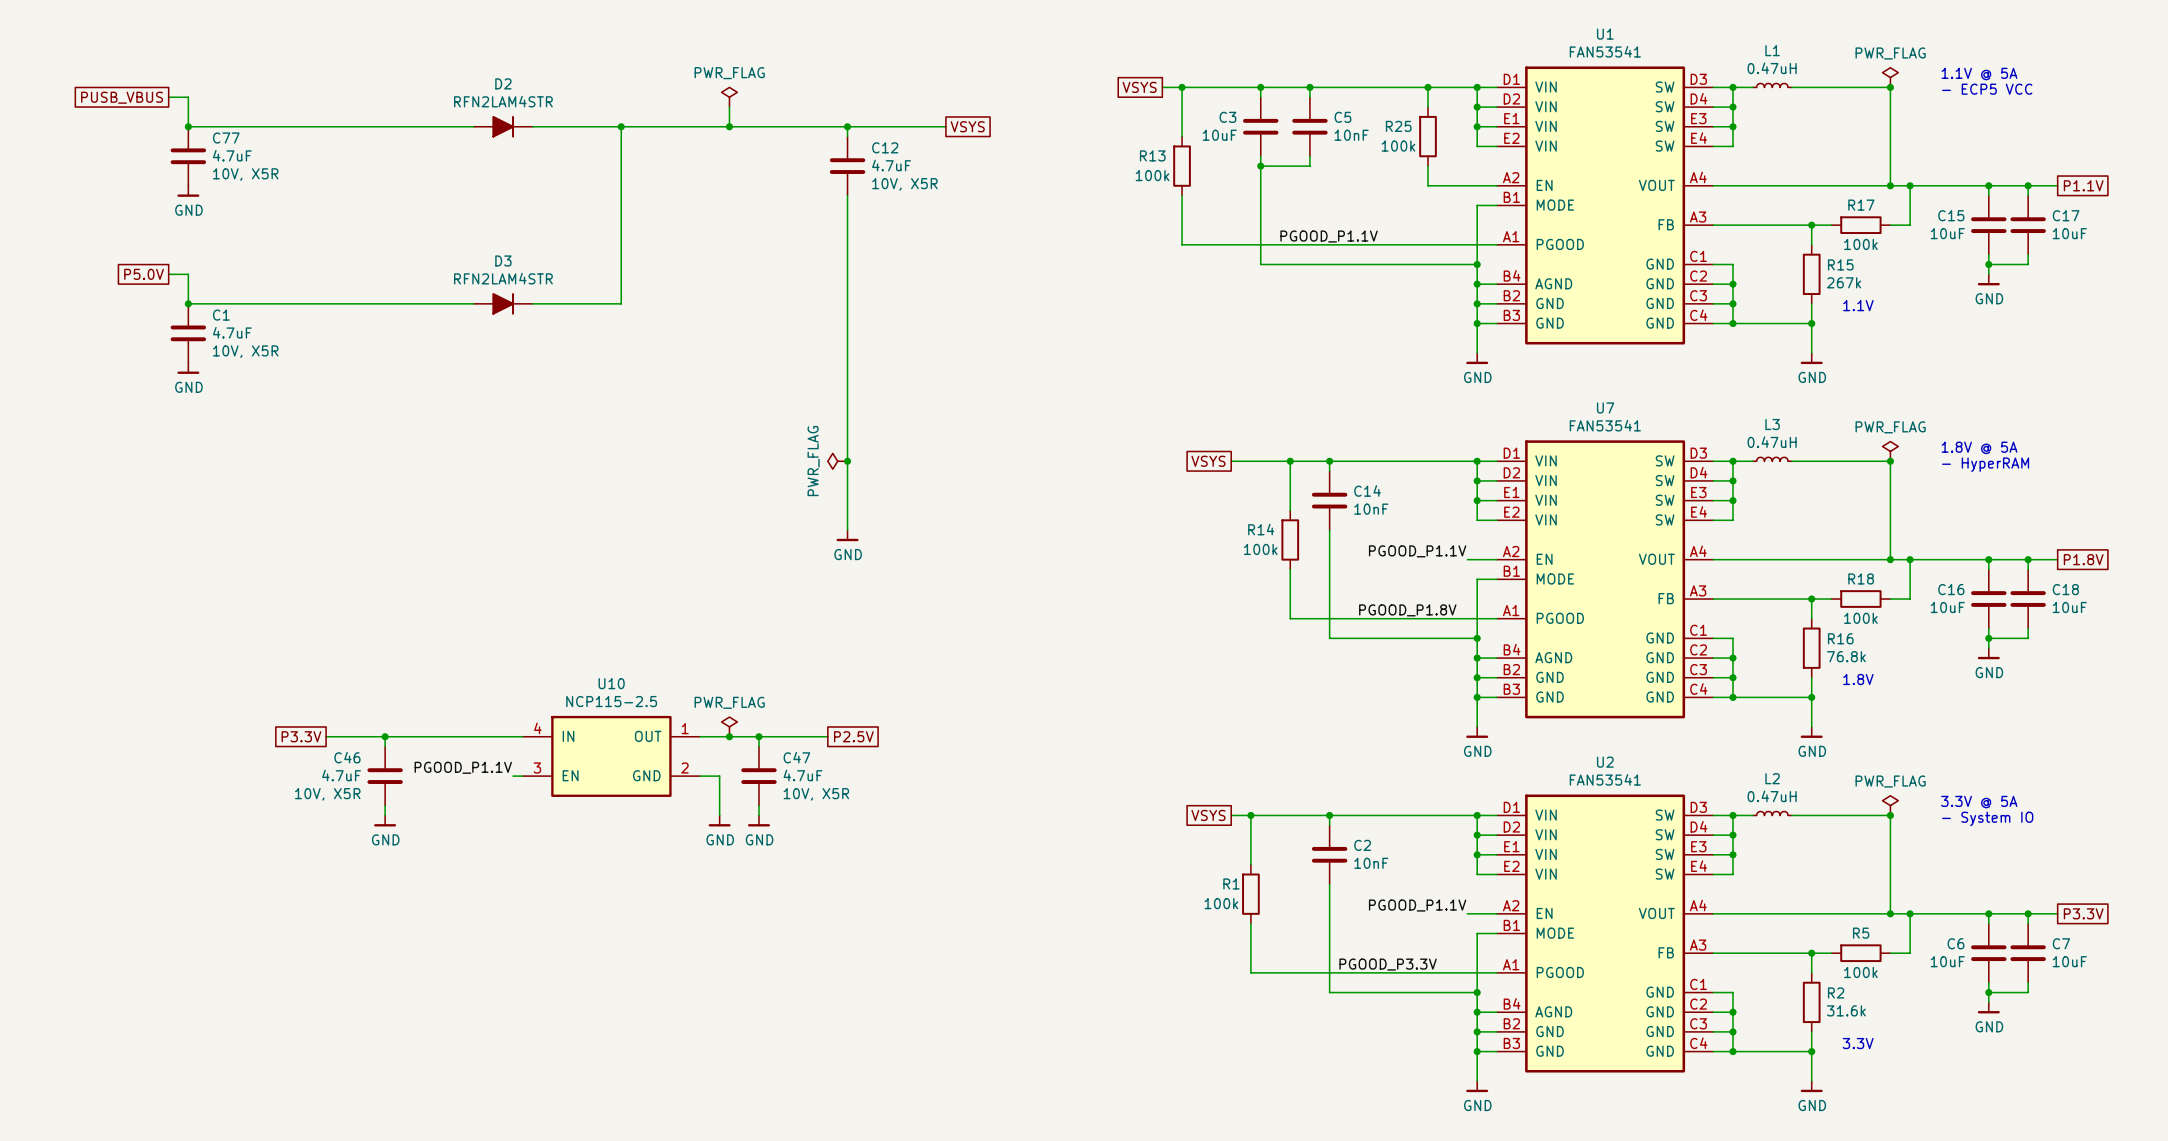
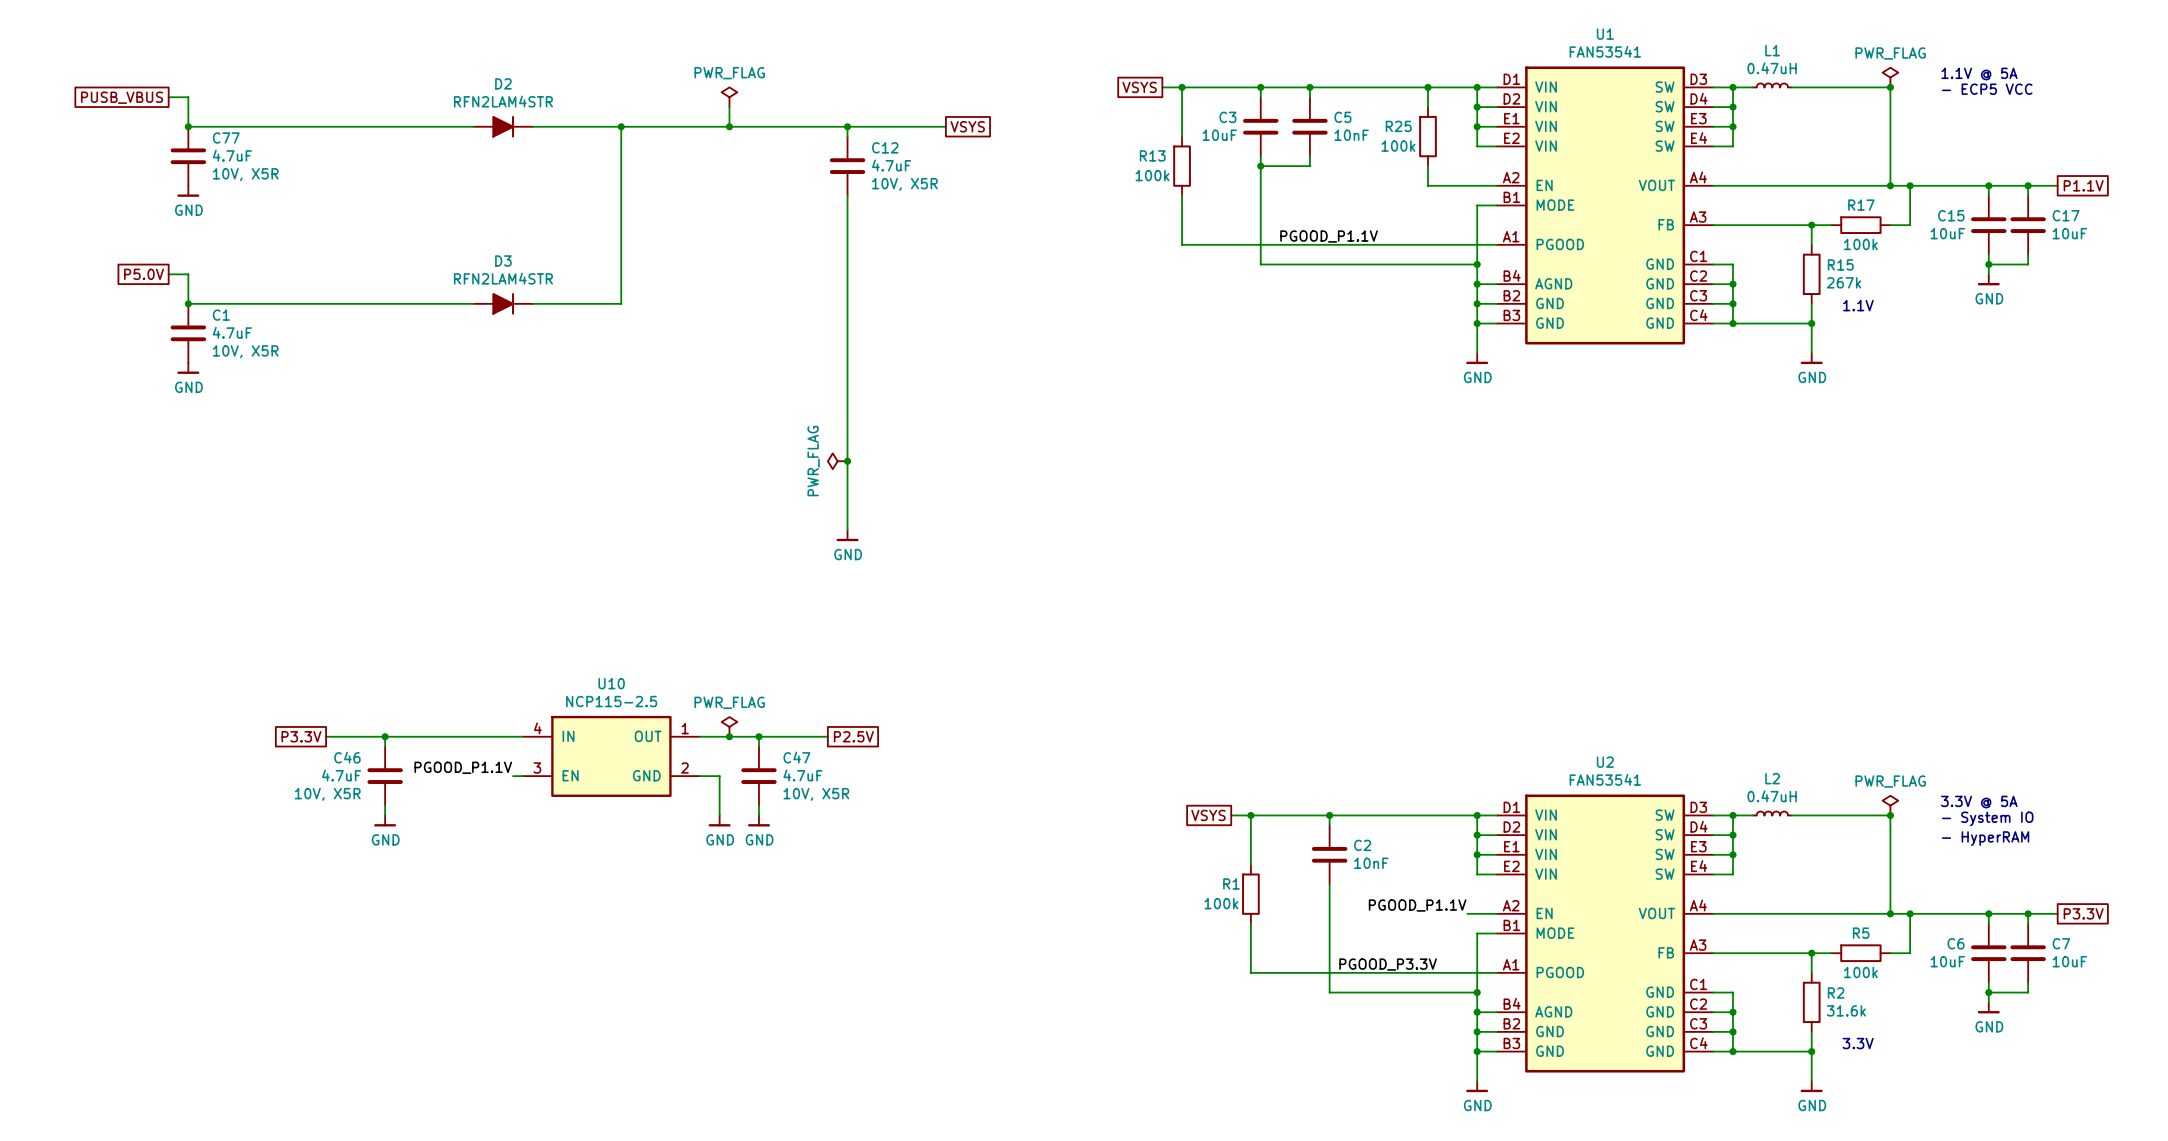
text: 1.8V @ 5A (1979, 447) -> none
power symbol: PWR_FLAG (1890, 451) -> none
L3: 0.47uH (1772, 459) -> none
global label: VSYS (1208, 461) -> none
wire: (1231, 461) (1496, 461) -> none
wire: (1290, 461) (1290, 510) -> none
junction: (1290, 461) -> none
wire: (1329, 461) (1329, 471) -> none
junction: (1329, 461) -> none
wire: (1477, 461) (1477, 520) (1496, 520) -> none
junction: (1477, 461) -> none
wire: (1713, 461) (1752, 461) -> none
wire: (1732, 461) (1732, 520) (1713, 520) -> none
junction: (1732, 461) -> none
wire: (1792, 461) (1890, 461) (1890, 559) -> none
junction: (1890, 461) -> none
text: - HyperRAM (1985, 464) -> none
wire: (1477, 480) (1496, 480) -> none
junction: (1477, 480) -> none
wire: (1713, 480) (1732, 480) -> none
junction: (1732, 480) -> none
C14: 10nF (1329, 500) -> none
wire: (1477, 500) (1496, 500) -> none
junction: (1477, 500) -> none
wire: (1713, 500) (1732, 500) -> none
junction: (1732, 500) -> none
wire: (1329, 530) (1329, 638) (1477, 638) -> none
R14: 100k (1290, 539) -> none
label: PGOOD_P1.1V (1417, 551) -> none
wire: (1467, 559) (1496, 559) -> none
wire: (1713, 559) (2057, 559) -> none
junction: (1890, 559) -> none
wire: (1910, 559) (1910, 599) (1890, 599) -> none
junction: (1910, 559) -> none
wire: (1988, 559) (1988, 569) -> none
junction: (1988, 559) -> none
wire: (2028, 559) (2028, 569) -> none
junction: (2028, 559) -> none
global label: P1.8V (2083, 559) -> none
wire: (1290, 569) (1290, 618) (1496, 618) -> none
wire: (1496, 579) (1477, 579) (1477, 726) -> none
U7: FAN53541 (1605, 579) -> none
wire: (1713, 599) (1831, 599) -> none
wire: (1811, 599) (1811, 618) -> none
junction: (1811, 599) -> none
R18: 100k (1860, 599) -> none
C16: 10uF (1988, 599) -> none
C18: 10uF (2028, 599) -> none
label: PGOOD_P1.8V (1407, 610) -> none
wire: (1988, 628) (1988, 648) -> none
wire: (2028, 628) (2028, 638) (1988, 638) -> none
junction: (1477, 638) -> none
wire: (1713, 638) (1732, 638) (1732, 697) -> none
junction: (1988, 638) -> none
R16: 76.8k (1811, 648) -> none
power symbol: GND (1988, 653) -> none
wire: (1477, 658) (1496, 658) -> none
junction: (1477, 658) -> none
wire: (1713, 658) (1732, 658) -> none
junction: (1732, 658) -> none
wire: (1477, 677) (1496, 677) -> none
junction: (1477, 677) -> none
wire: (1713, 677) (1732, 677) -> none
junction: (1732, 677) -> none
wire: (1811, 677) (1811, 726) -> none
text: 1.8V (1858, 679) -> none
wire: (1477, 697) (1496, 697) -> none
junction: (1477, 697) -> none
wire: (1713, 697) (1811, 697) -> none
junction: (1732, 697) -> none
junction: (1811, 697) -> none
power symbol: GND (1477, 732) -> none
power symbol: GND (1811, 732) -> none
text: none -> - HyperRAM (1985, 838)

